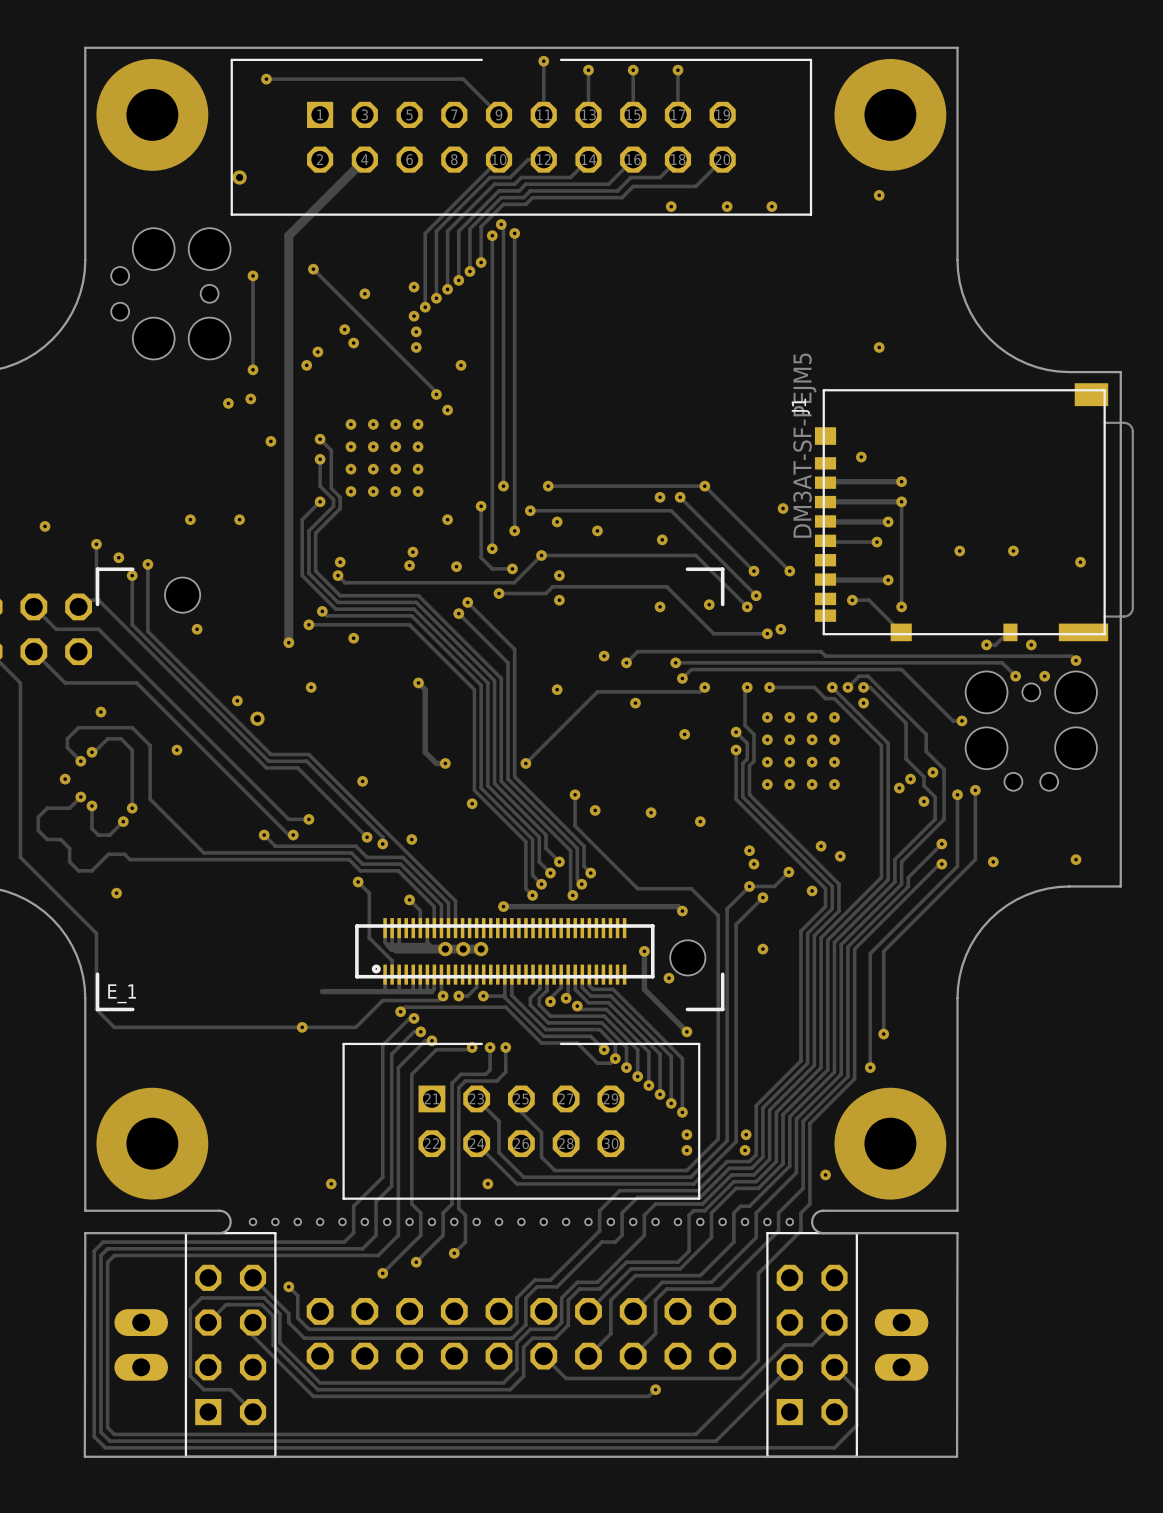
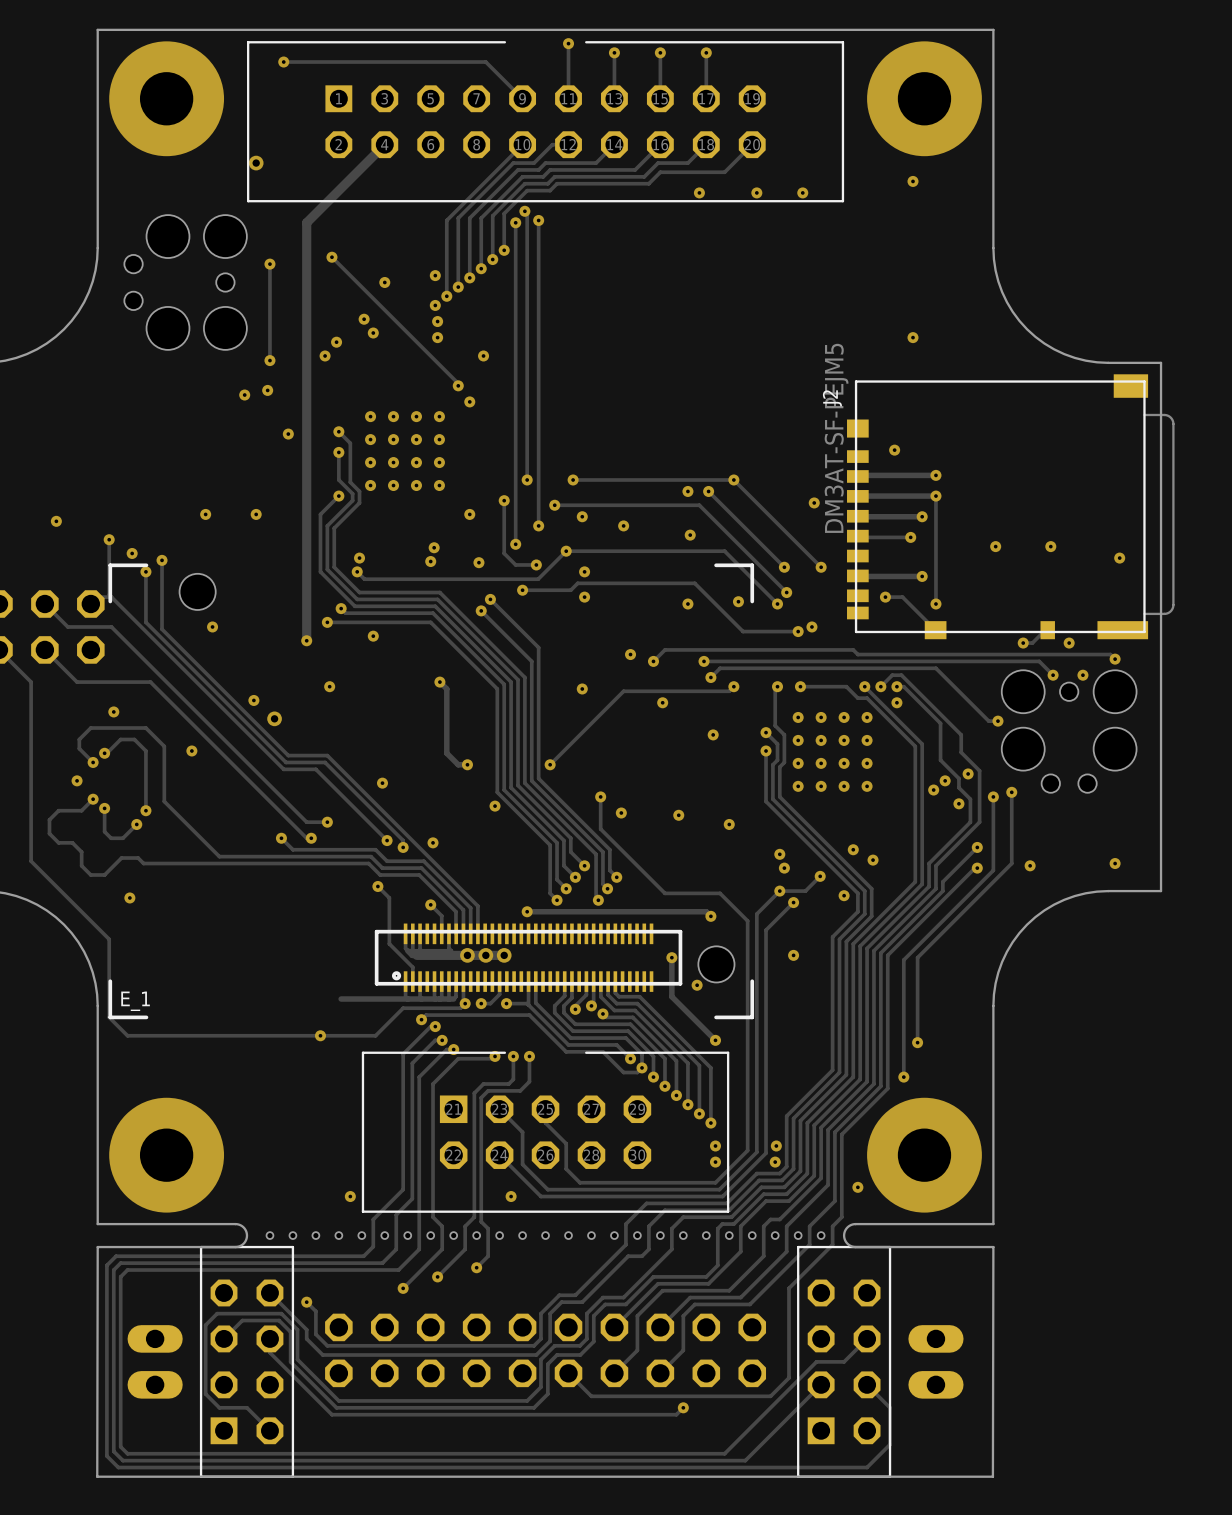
J1 name: J1 (800, 406) -> J2 (832, 398)

